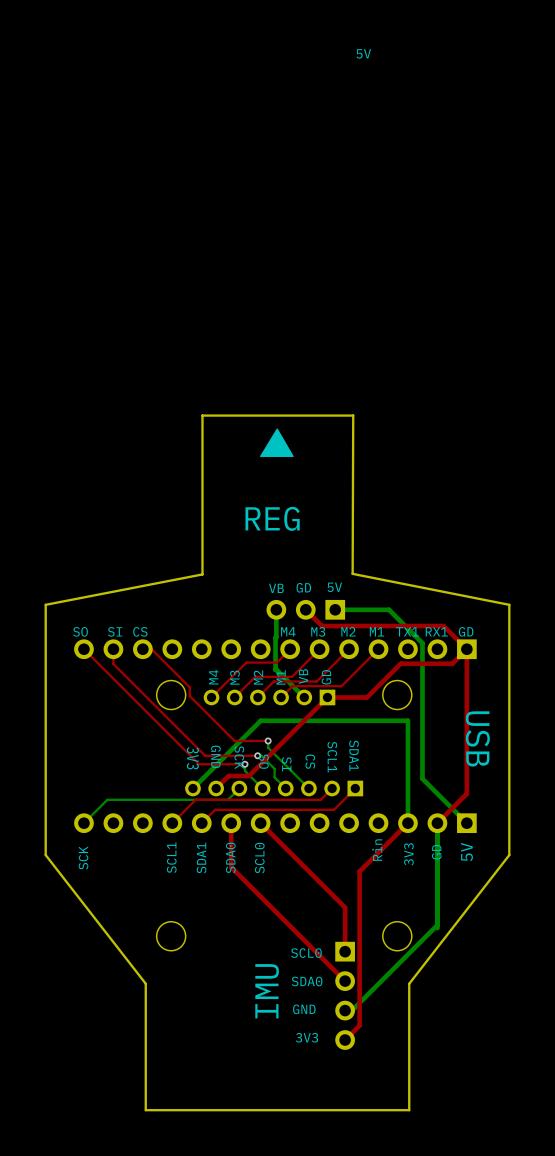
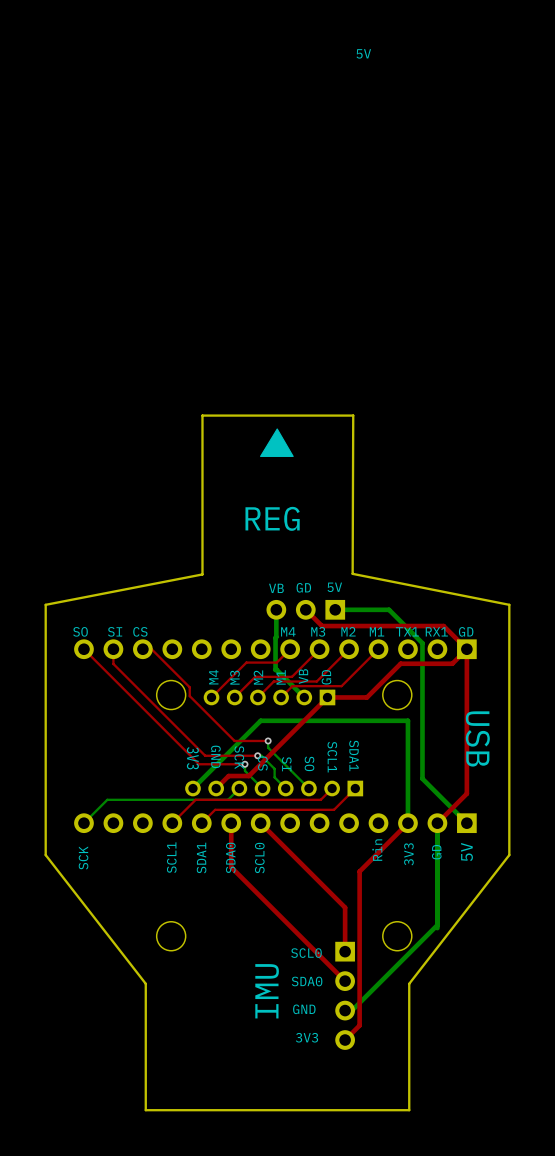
text position: SO (263, 761) -> SO (309, 763)
text position: CS (310, 761) -> CS (262, 763)

